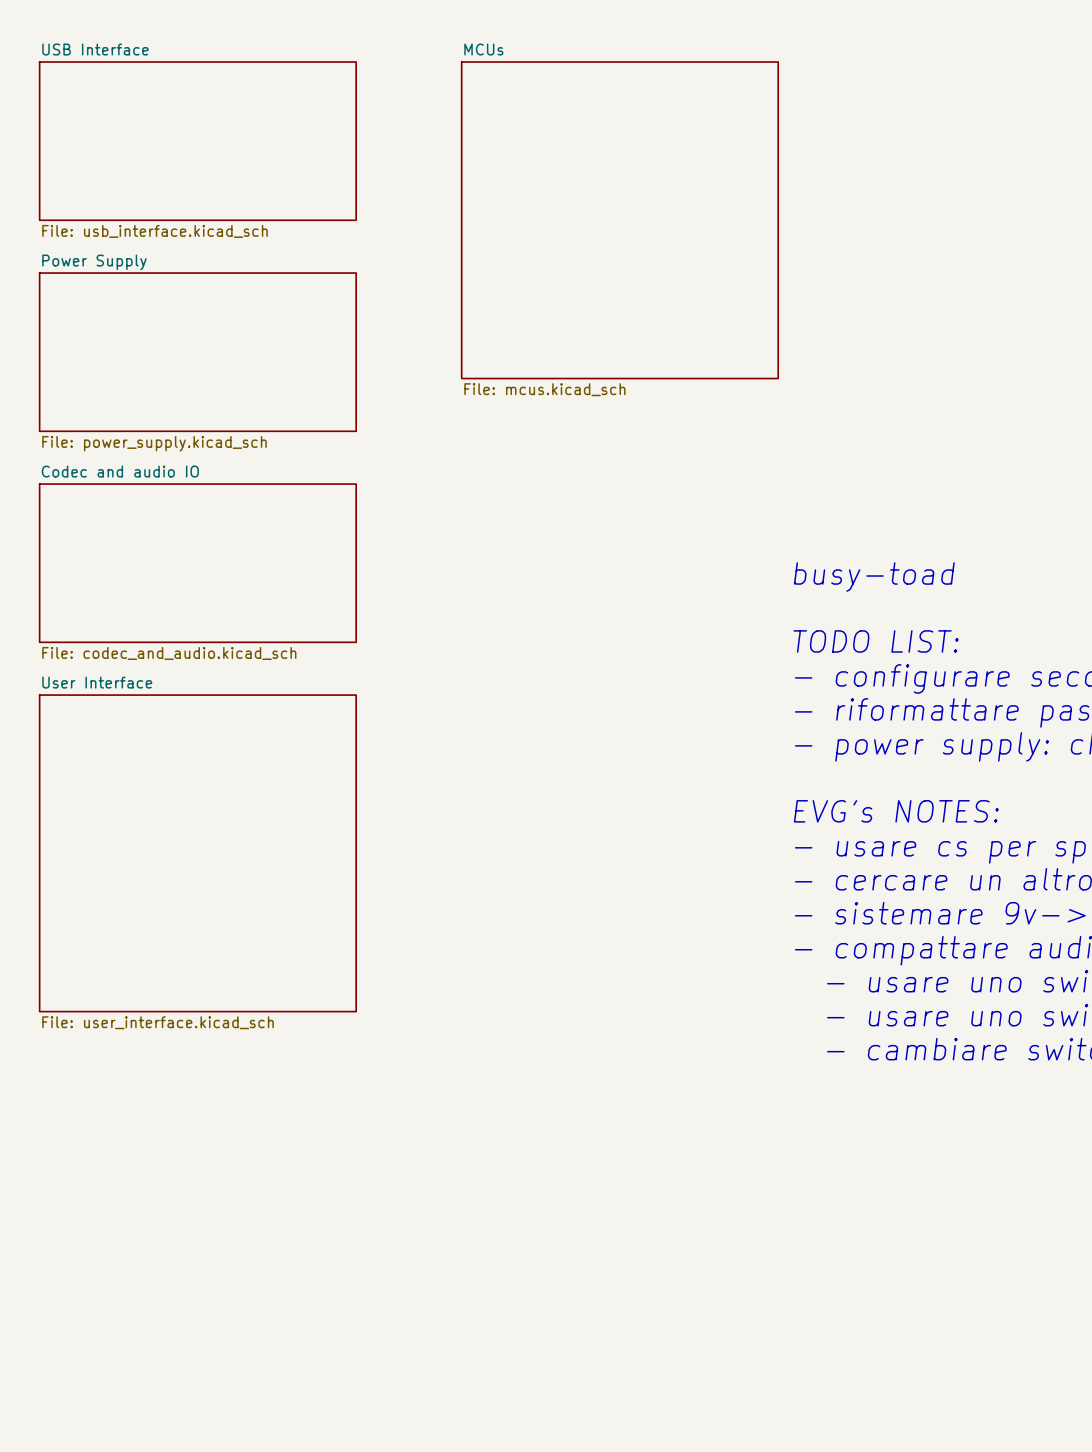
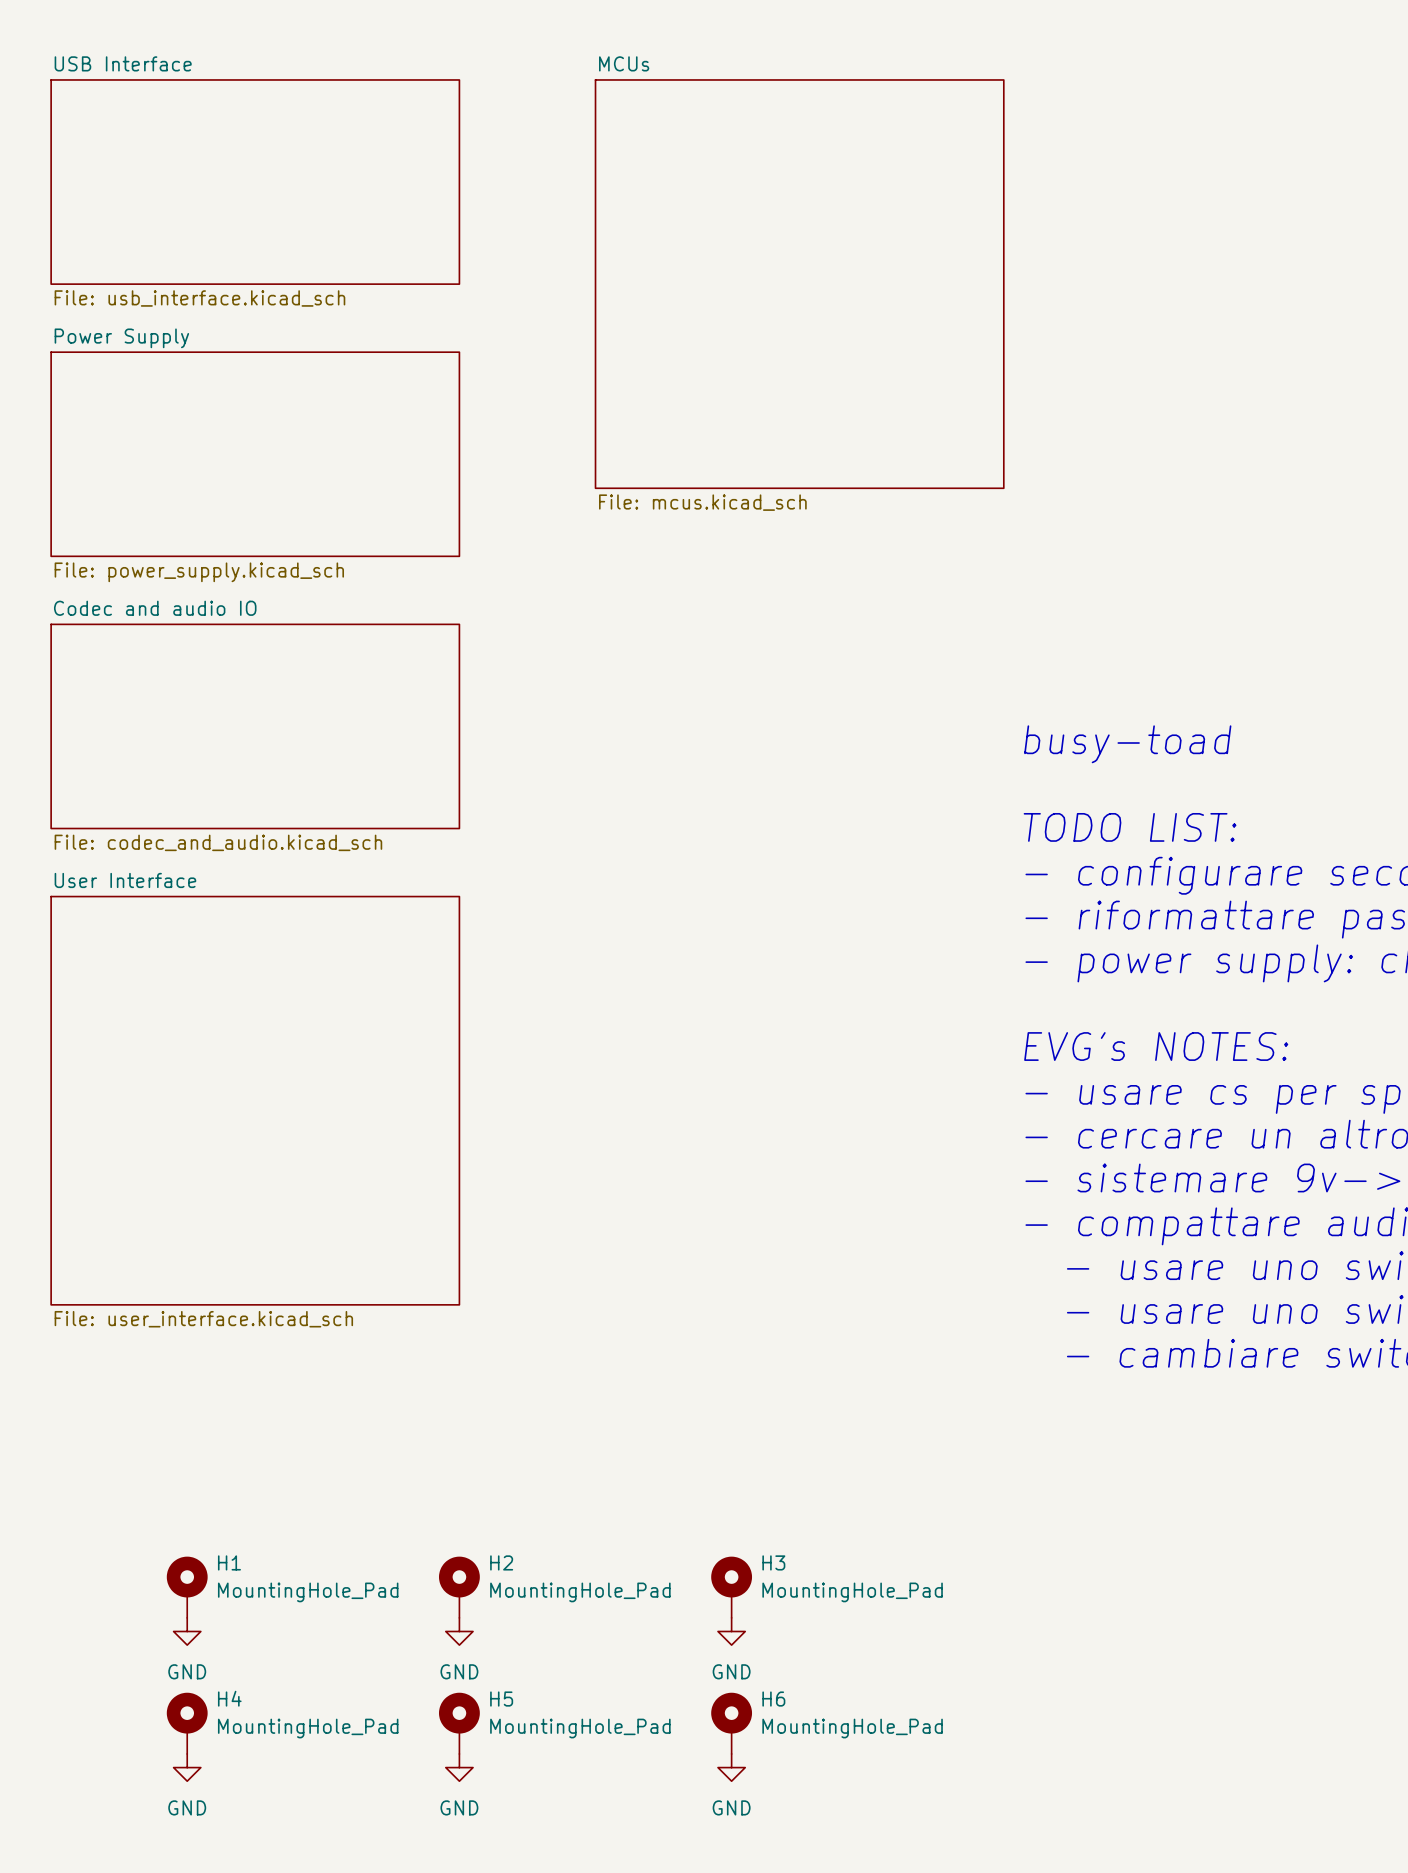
H1: none -> MountingHole_Pad (187, 1587)
H2: none -> MountingHole_Pad (459, 1587)
H3: none -> MountingHole_Pad (731, 1587)
power symbol: none -> GND (187, 1631)
power symbol: none -> GND (459, 1631)
power symbol: none -> GND (731, 1631)
H4: none -> MountingHole_Pad (187, 1723)
H5: none -> MountingHole_Pad (459, 1723)
H6: none -> MountingHole_Pad (731, 1723)
power symbol: none -> GND (187, 1767)
power symbol: none -> GND (459, 1767)
power symbol: none -> GND (731, 1767)

